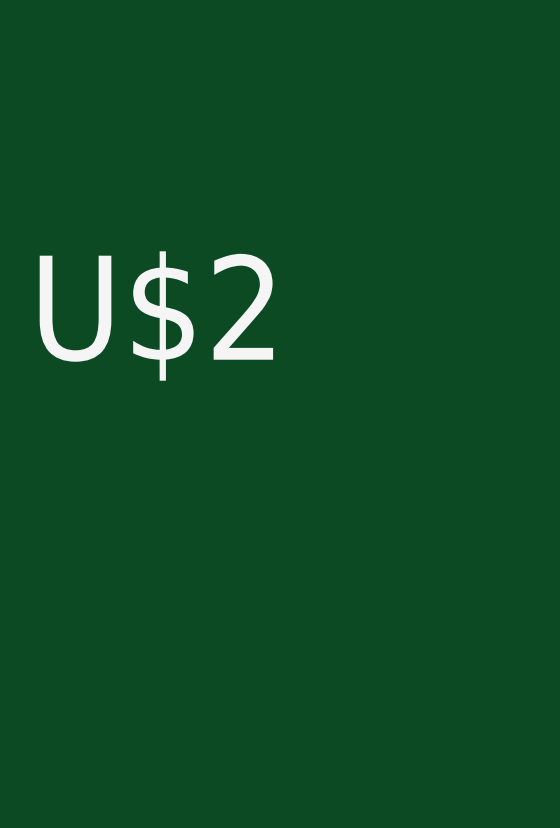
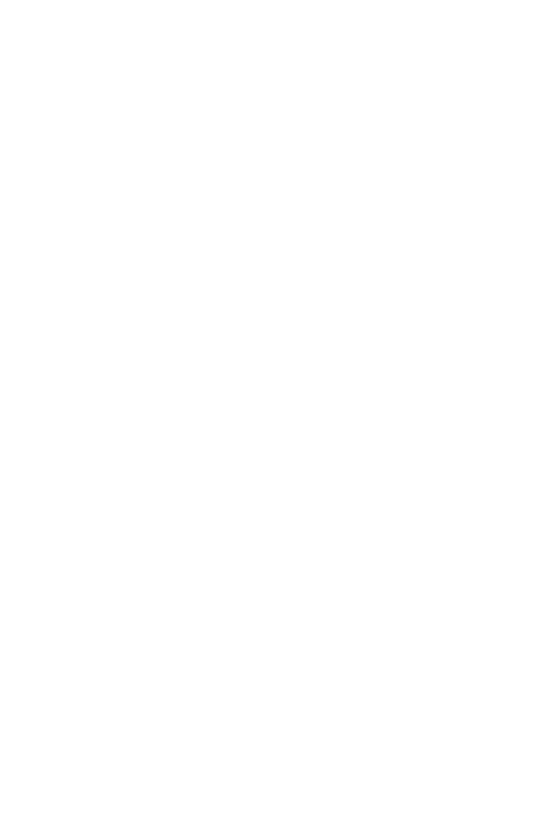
U$2 name: U$2 (156, 316) -> none

